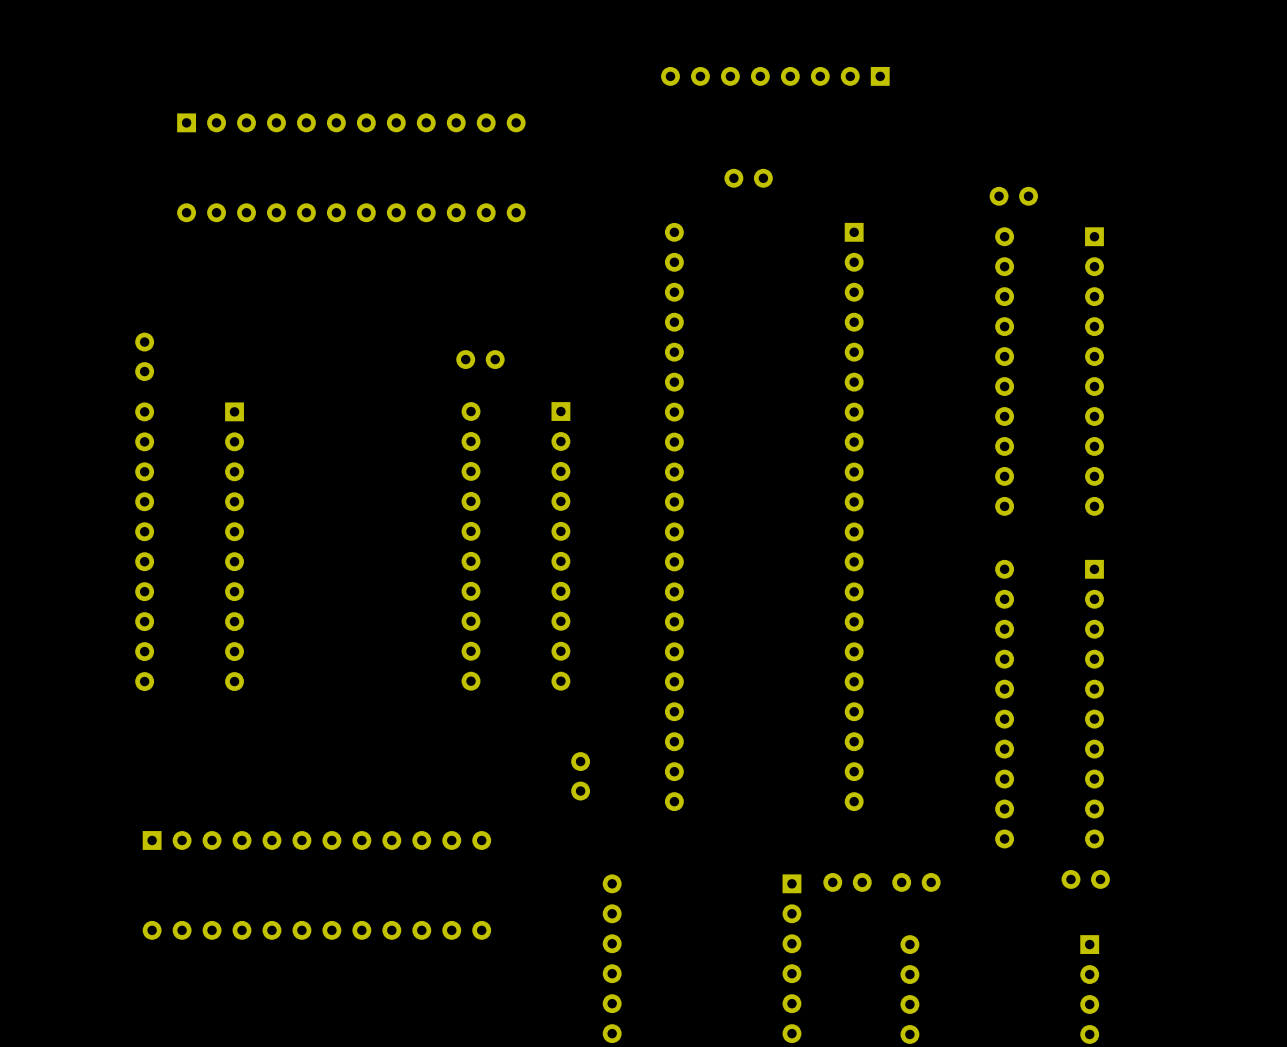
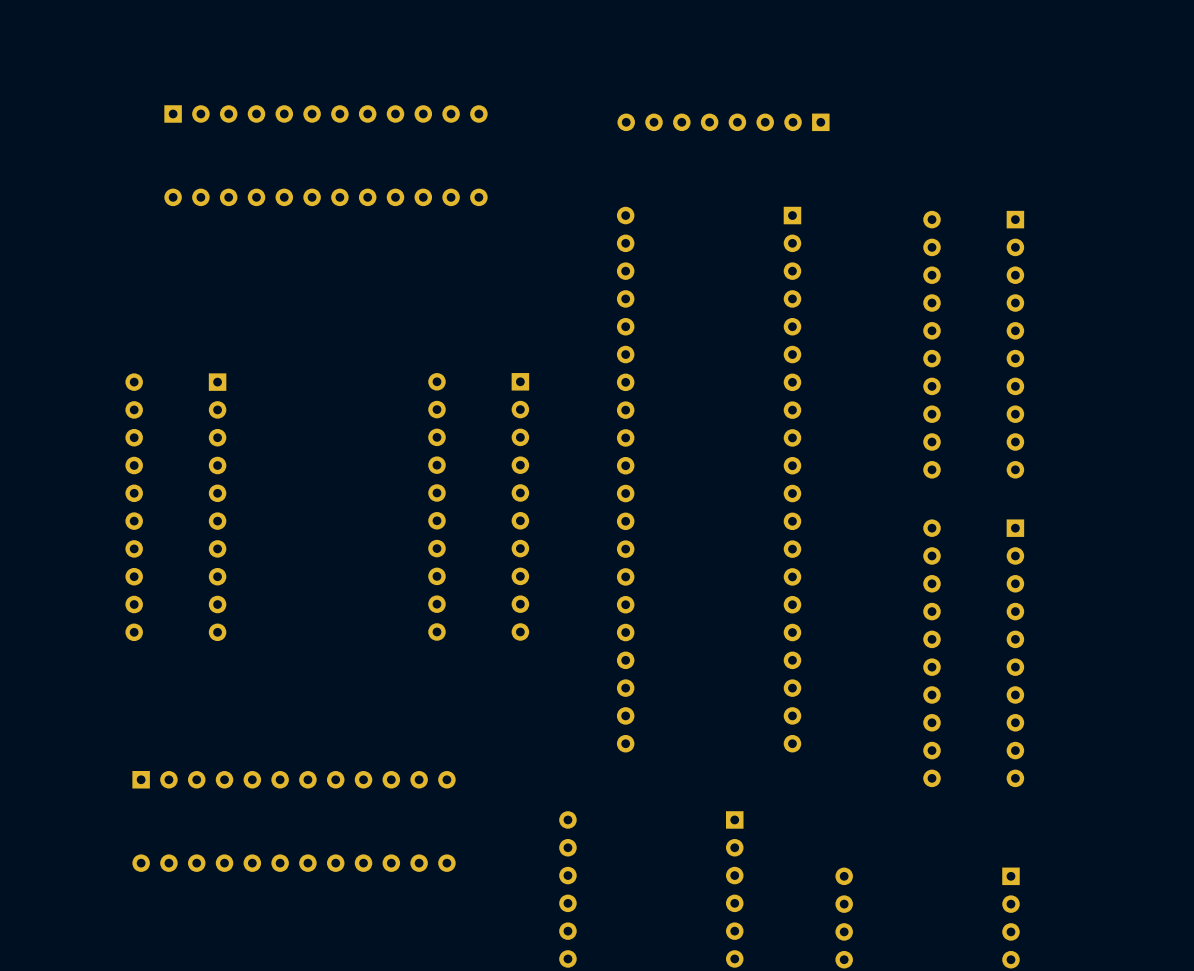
part position: (775, 76) -> (723, 122)
part: (748, 178) -> none
part: (1013, 196) -> none
part: (144, 356) -> none
part: (480, 359) -> none
part: (580, 776) -> none
part: (1085, 879) -> none
part: (847, 882) -> none
part: (916, 882) -> none

